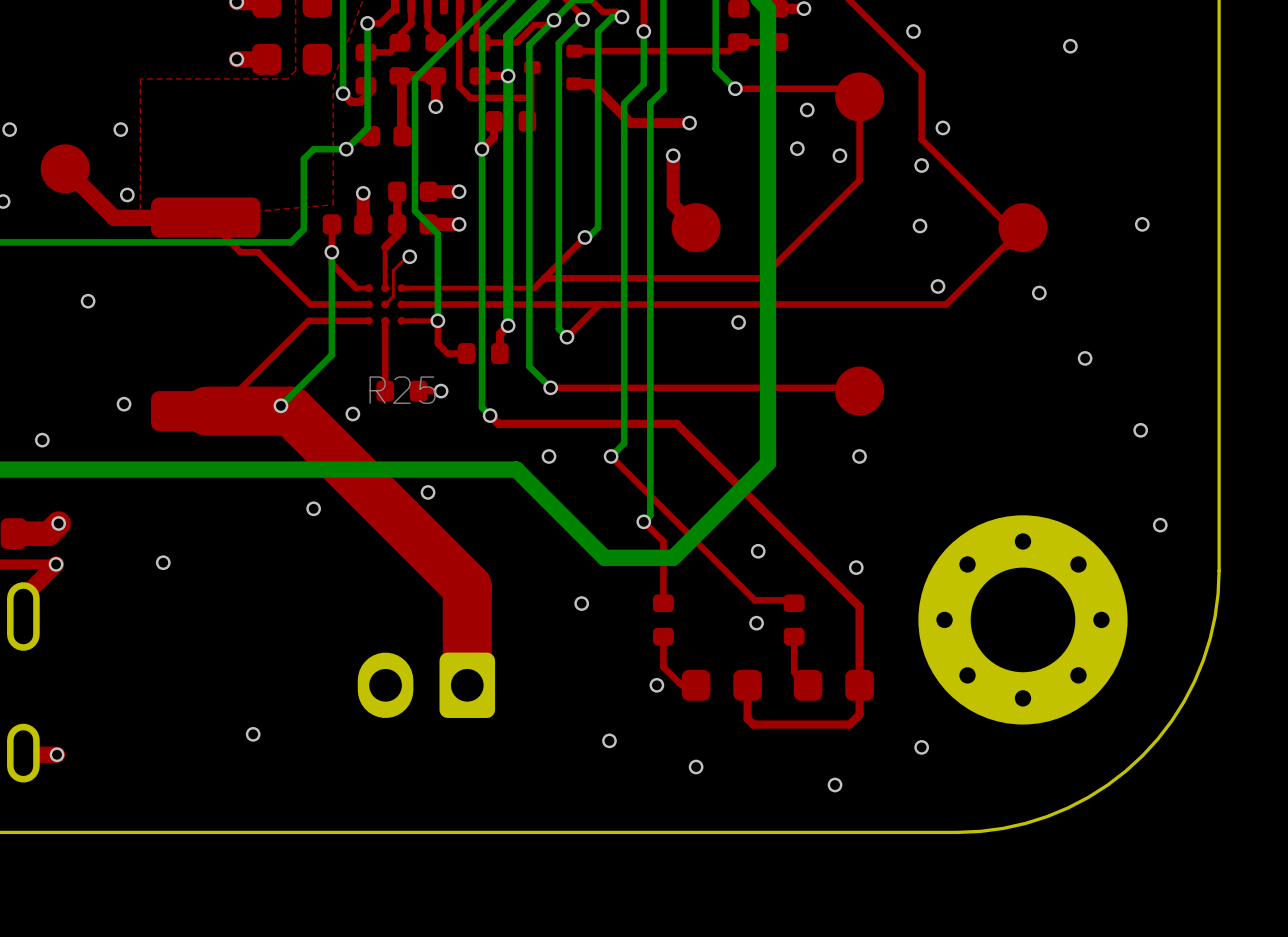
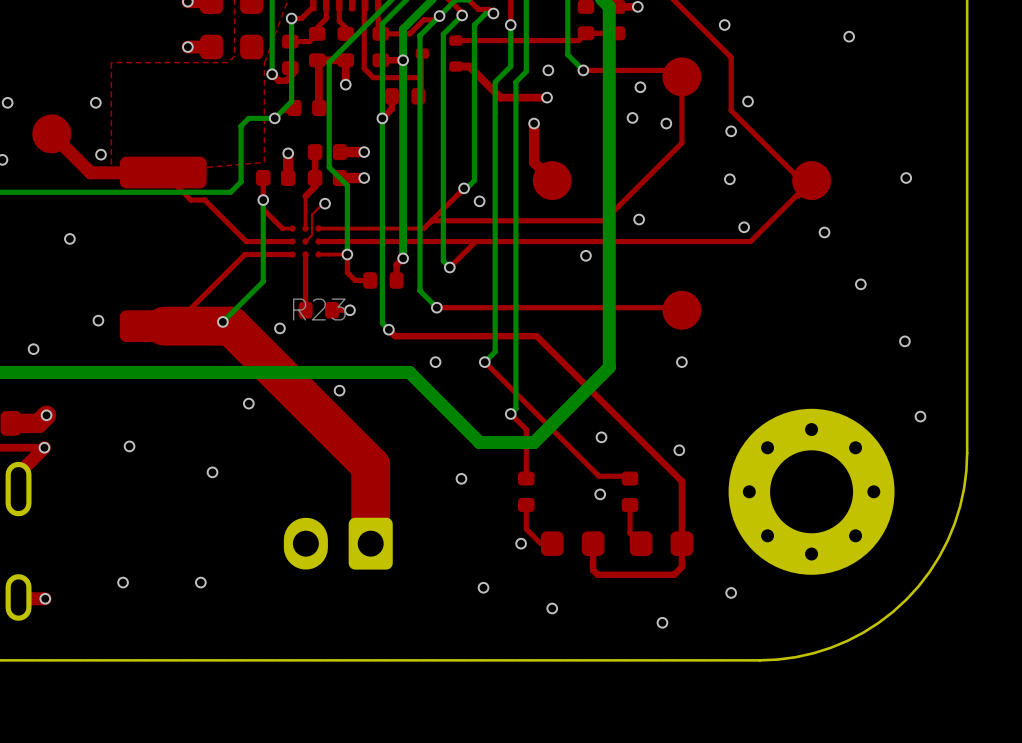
via: none -> (548, 70)
via: none -> (479, 201)
via: none -> (639, 219)
R25 name: R25 (402, 390) -> R23 (319, 309)
via: none -> (212, 472)
via: none -> (123, 582)

